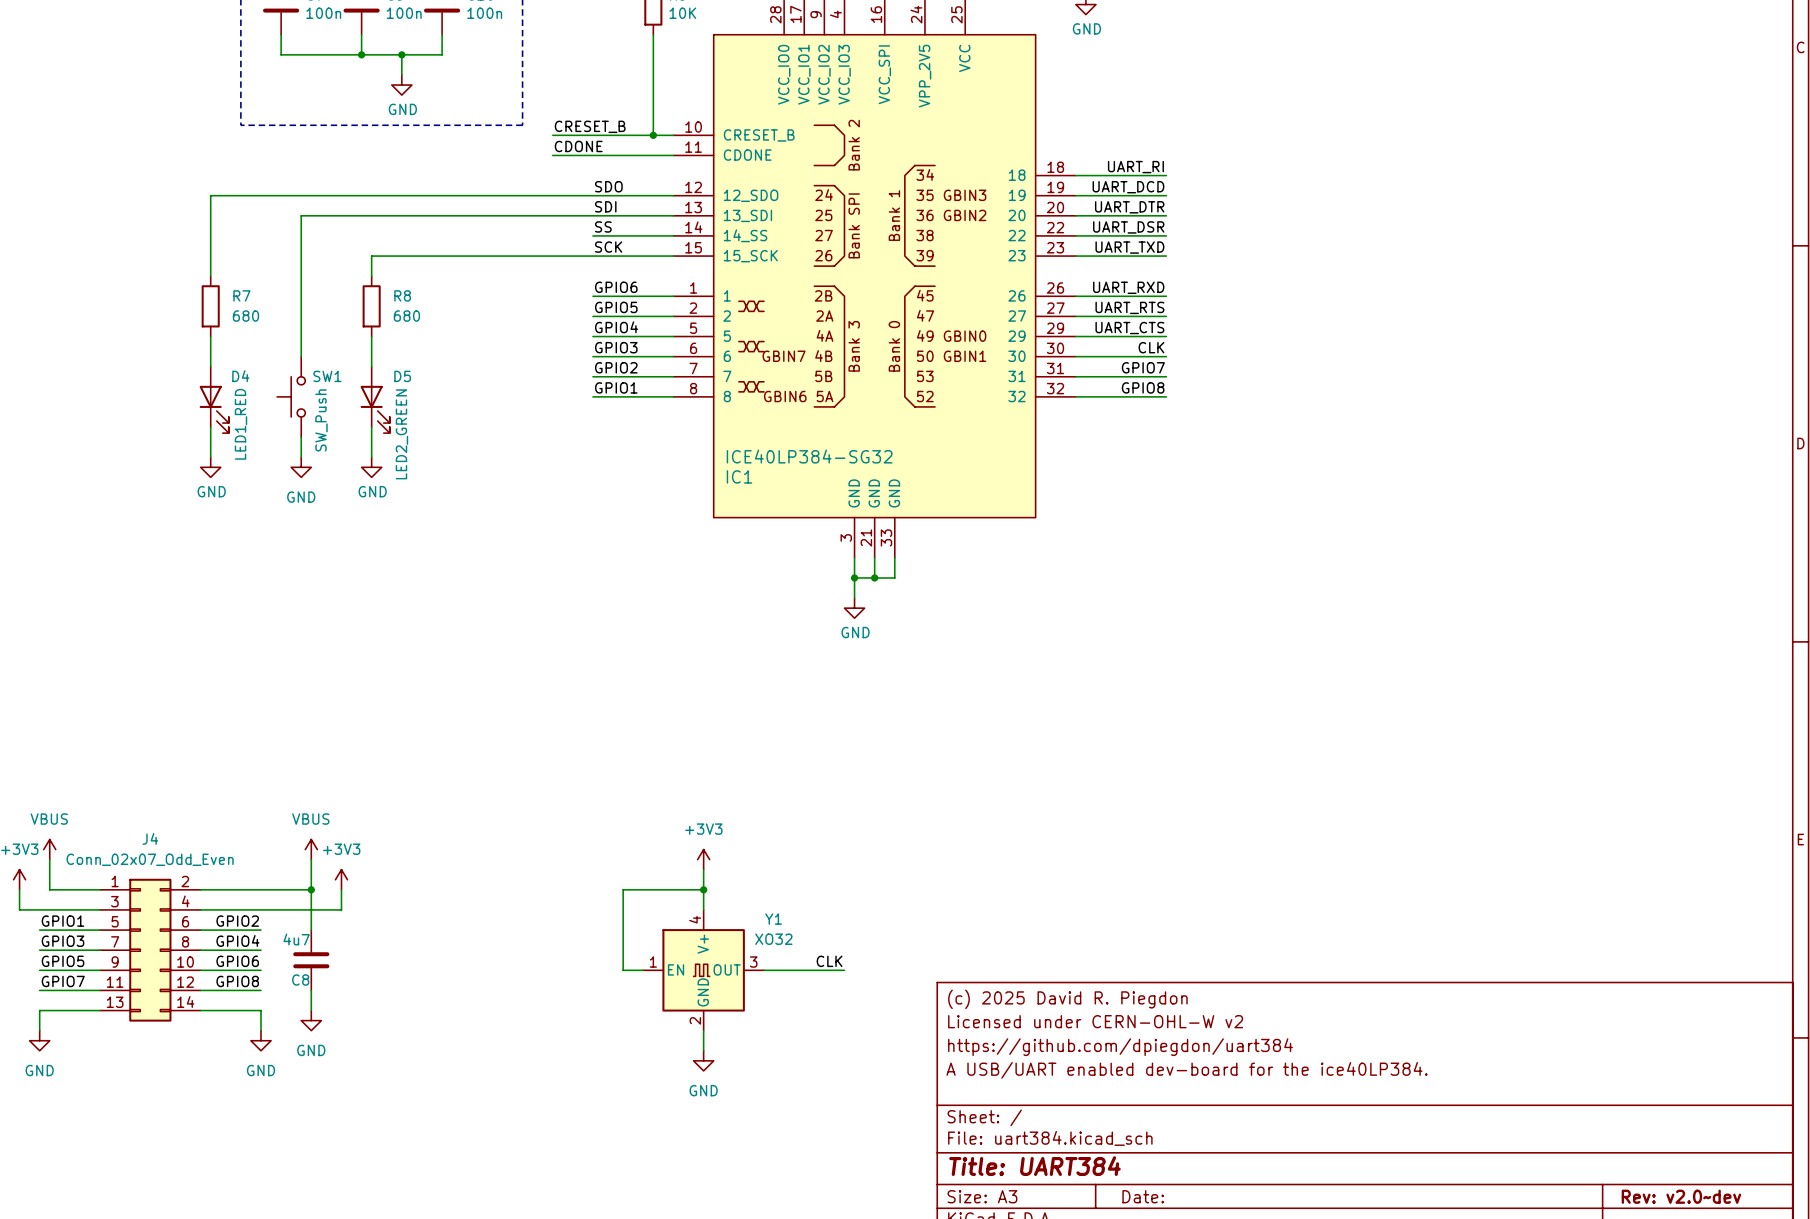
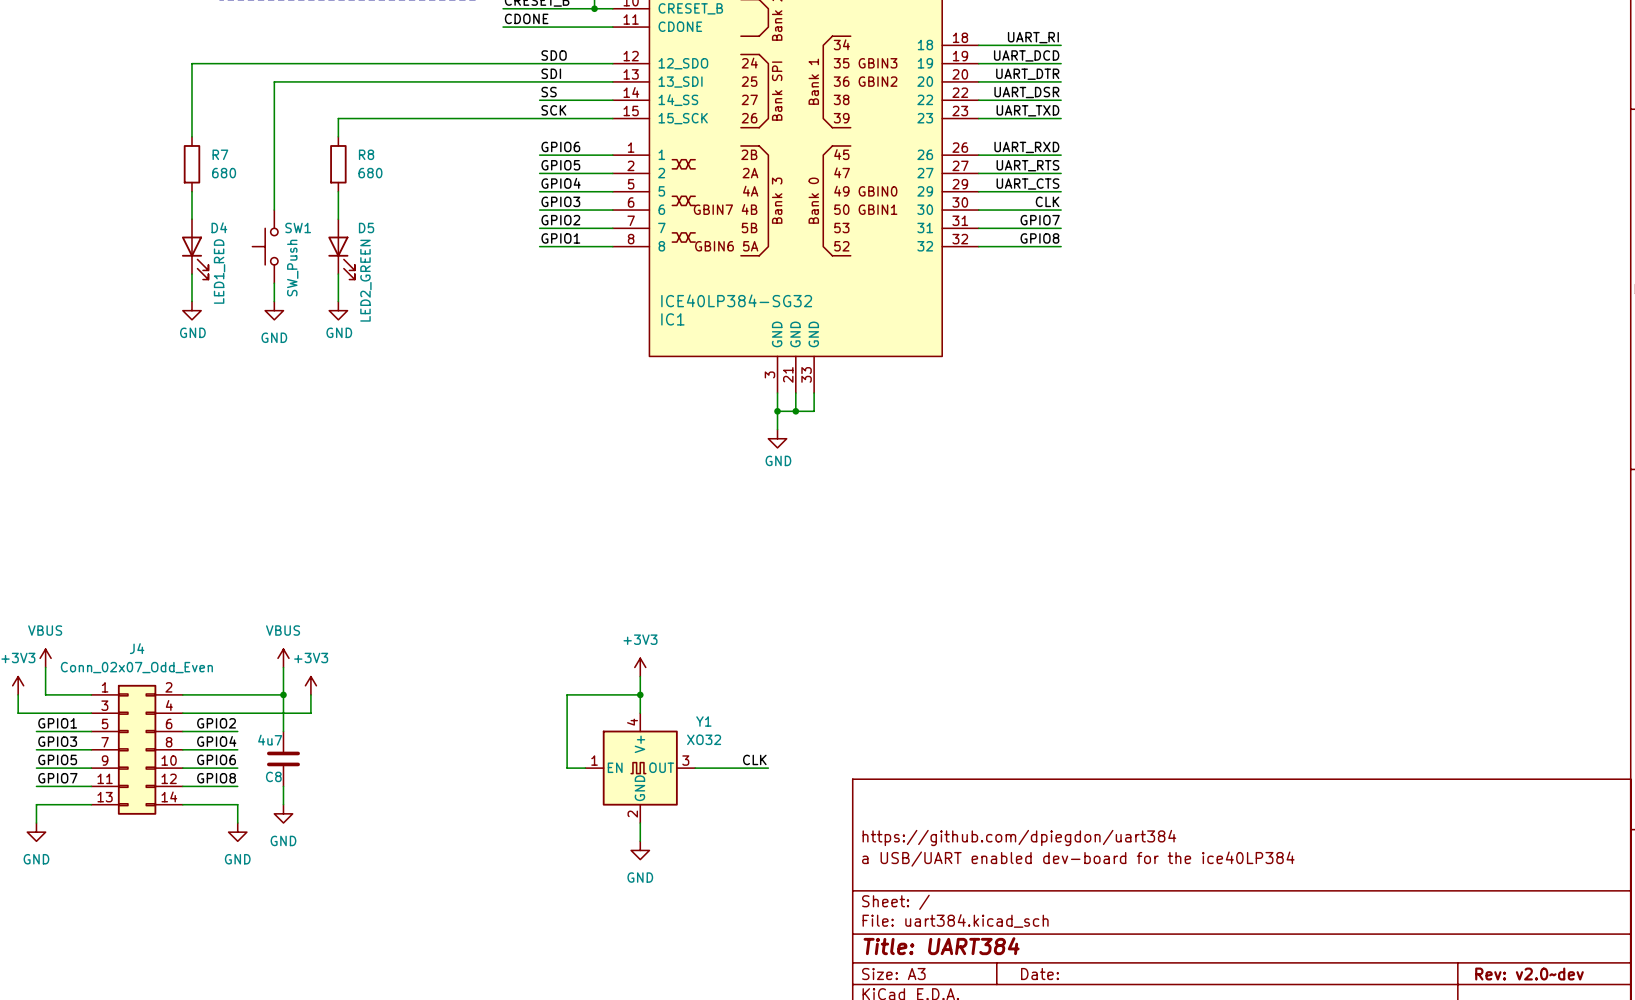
title block: (c) 2025 David R. Piegdon (1067, 999) -> none
title block: Licensed under CERN-OHL-W v2 (1095, 1021) -> none
title block: A USB/UART enabled dev-board for the ice40LP384. (1186, 1070) -> a USB/UART enabled dev-board for the ice40LP384 (1078, 859)

